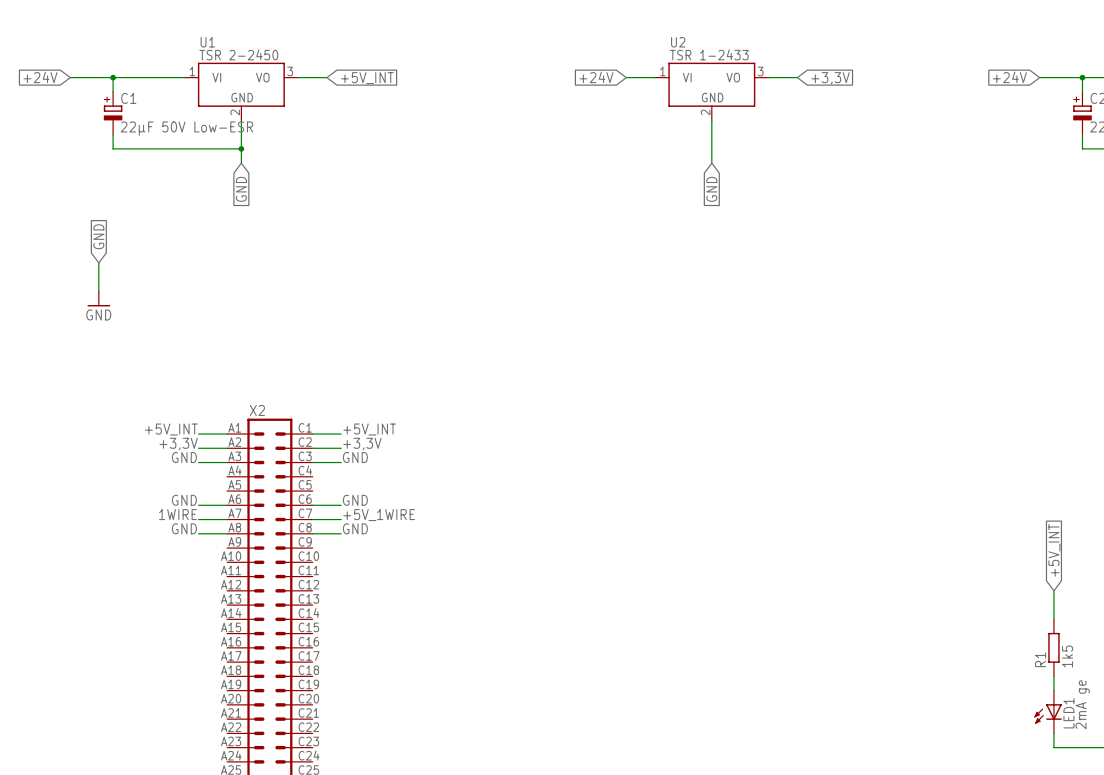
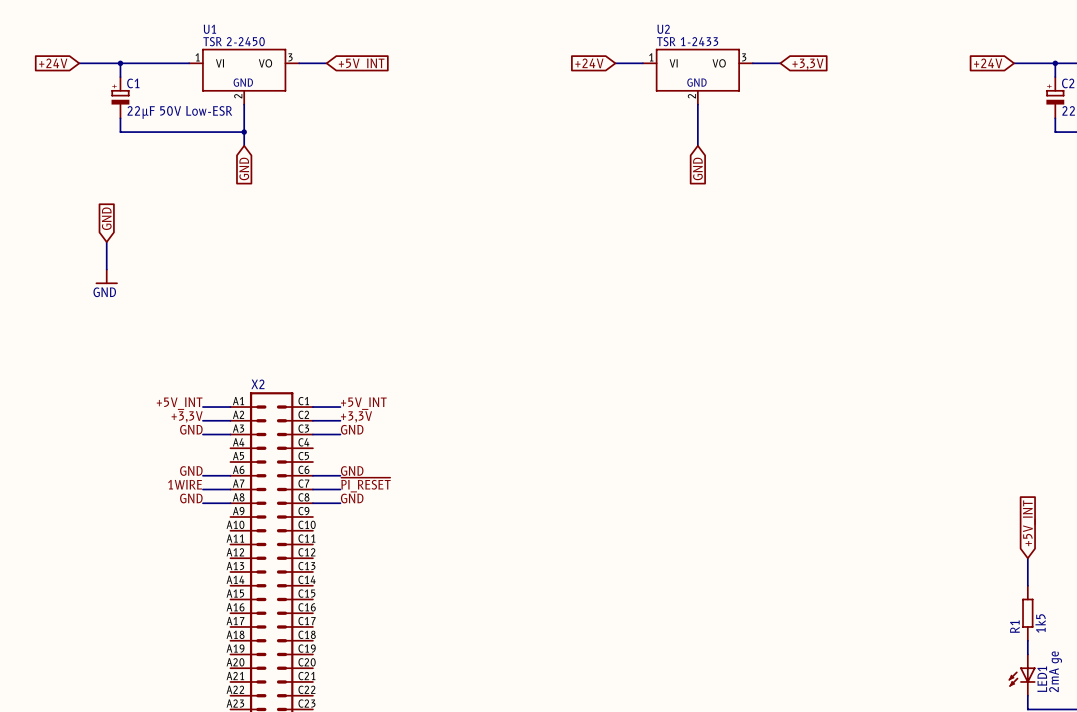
label: +5V_1WIRE (379, 515) -> ~{PI_RESET} (365, 485)

